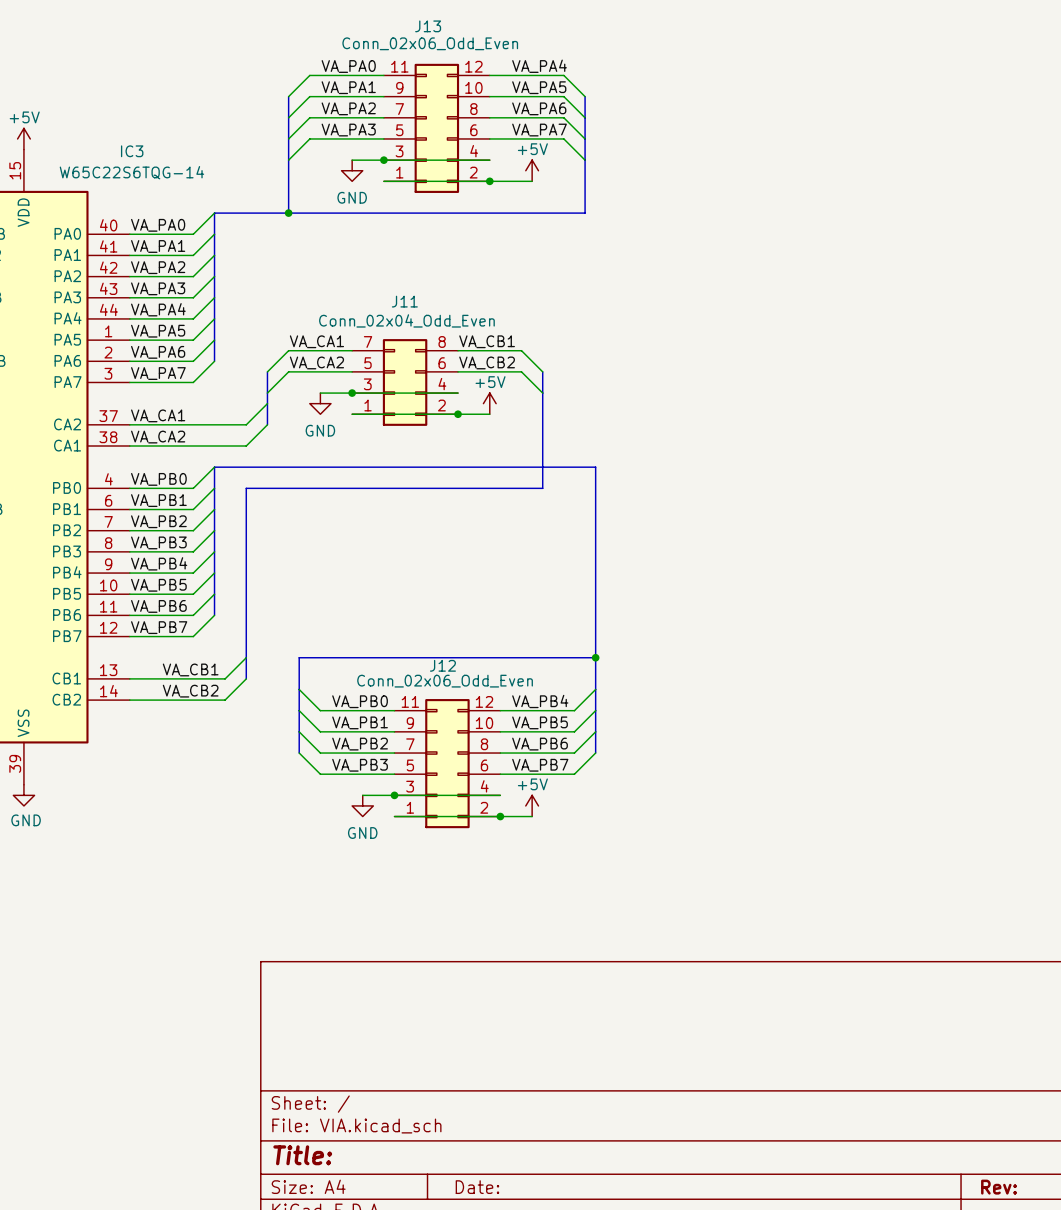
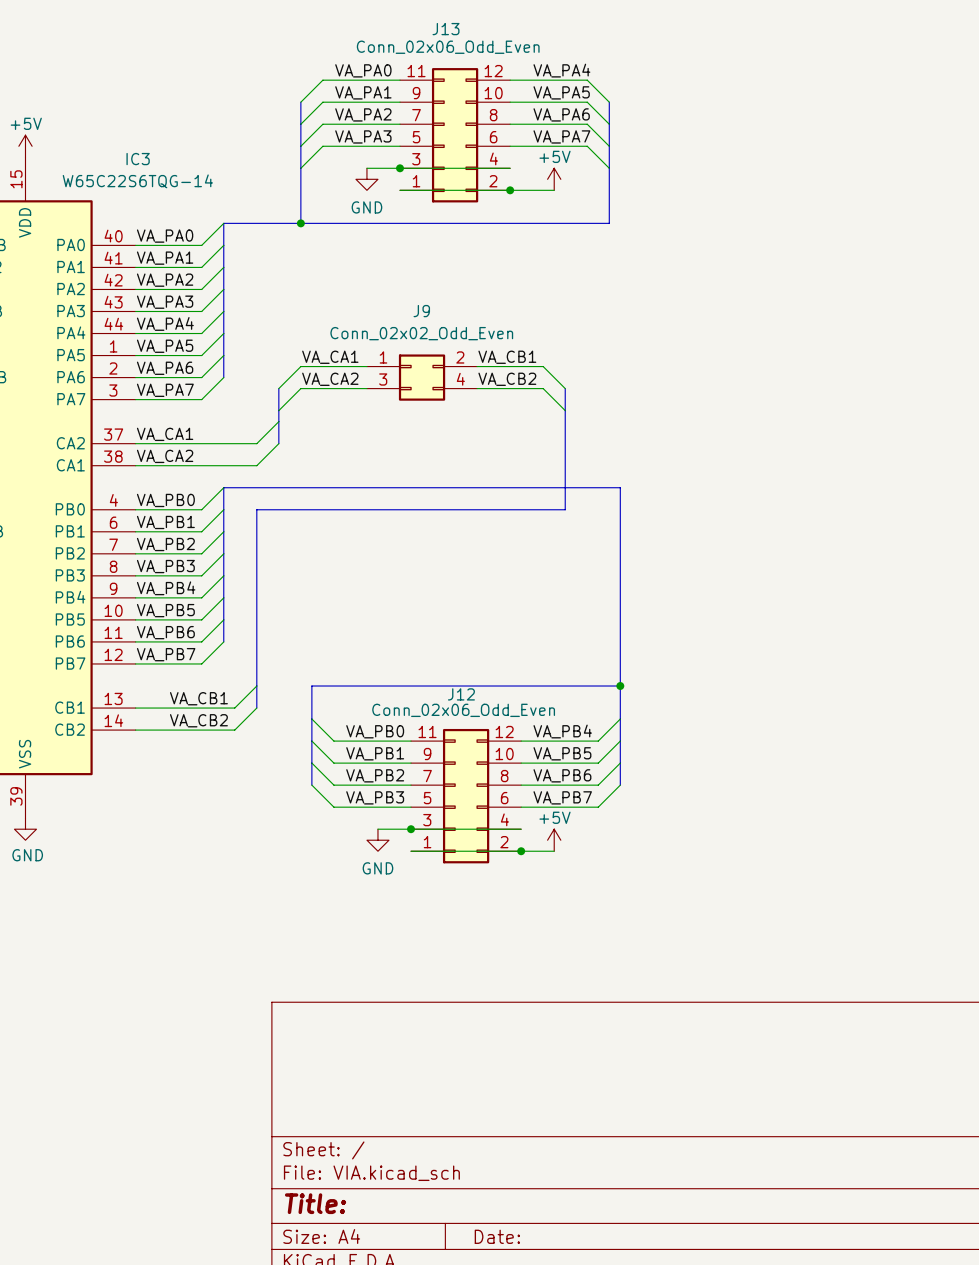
J9: none -> Conn_02x02_Odd_Even (422, 377)
J11: Conn_02x04_Odd_Even (405, 382) -> none
wire: (320, 393) (458, 393) -> none
junction: (352, 393) -> none
power symbol: GND (320, 403) -> none
power symbol: +5V (489, 403) -> none
wire: (352, 414) (489, 414) -> none
junction: (458, 414) -> none

